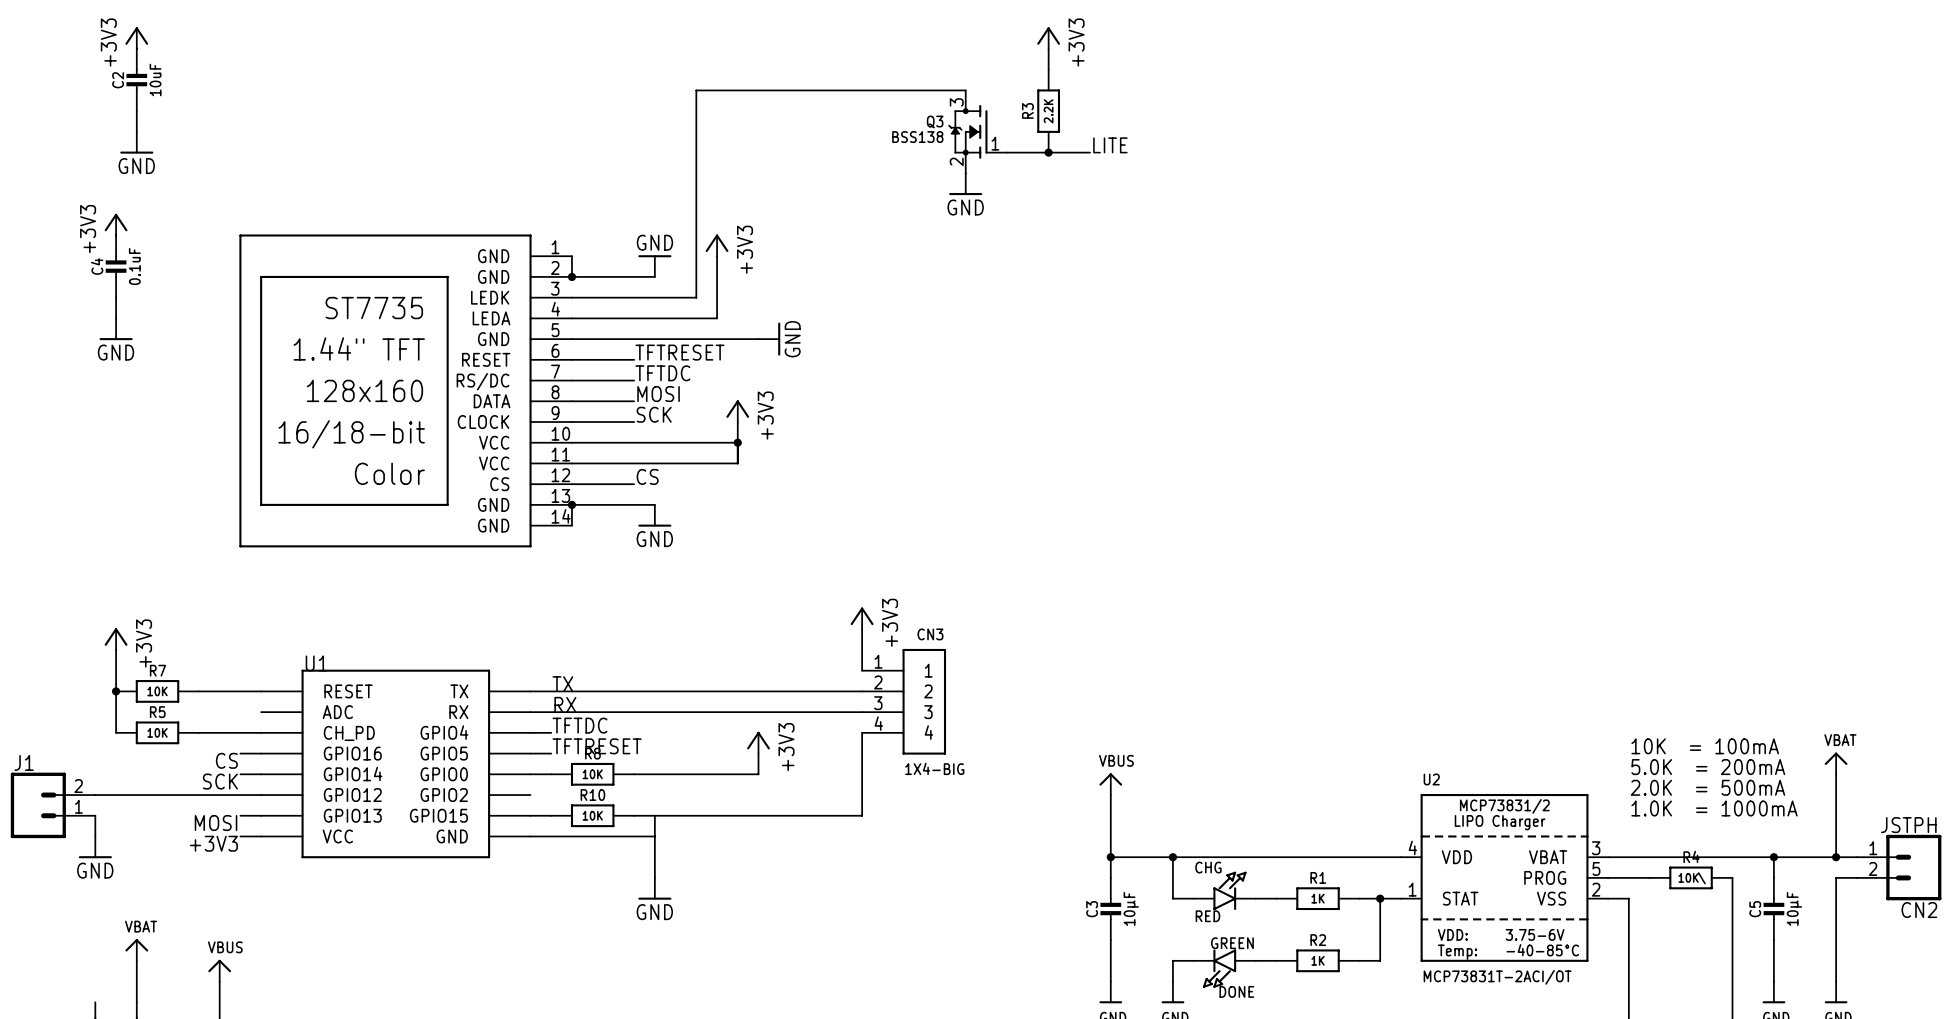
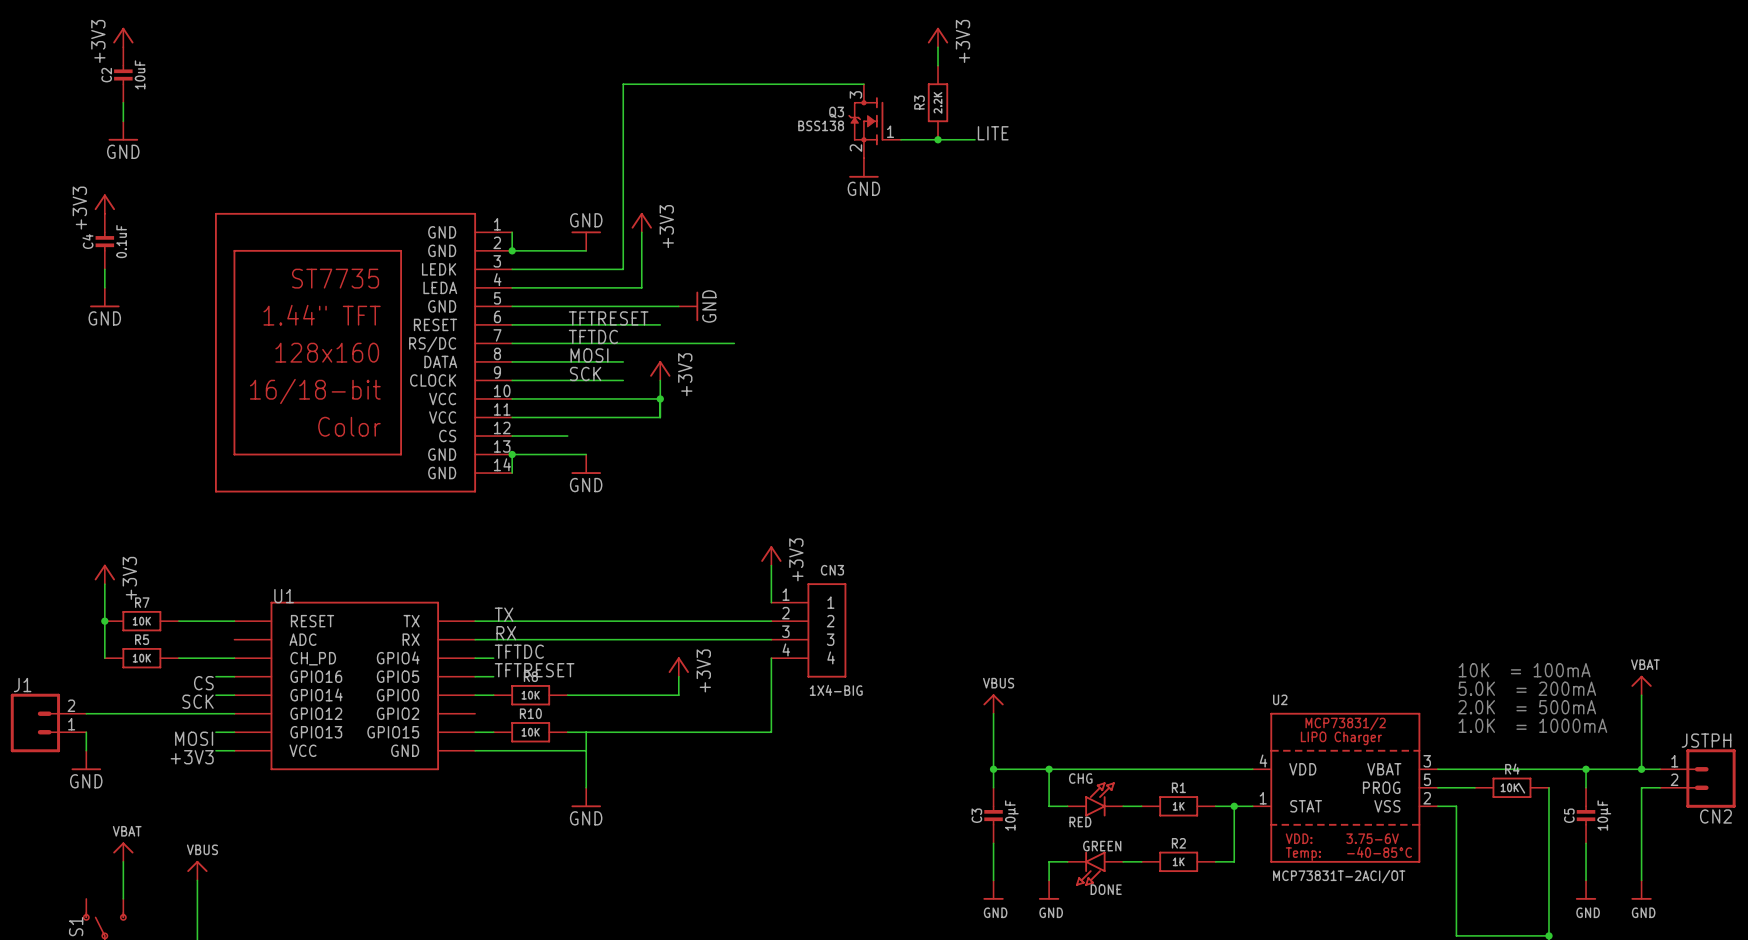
wire: none -> (567, 324) (660, 324)
wire: none -> (567, 343) (734, 343)
wire: none -> (567, 361) (623, 361)
wire: none -> (567, 380) (623, 380)
label: CS (647, 476) -> none

